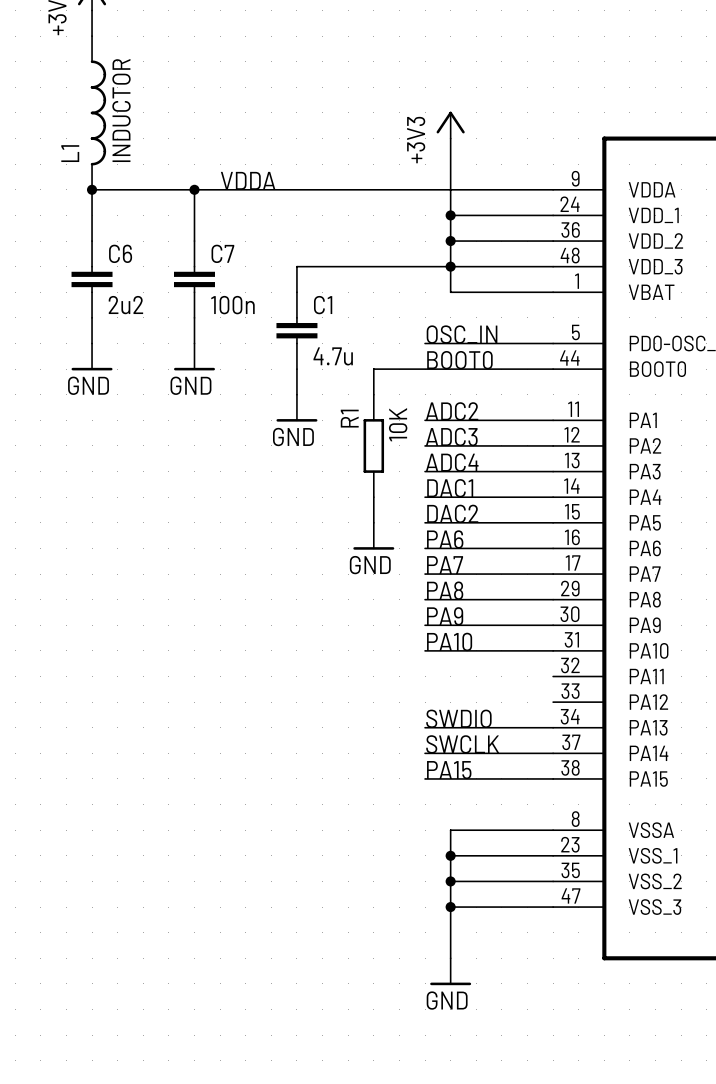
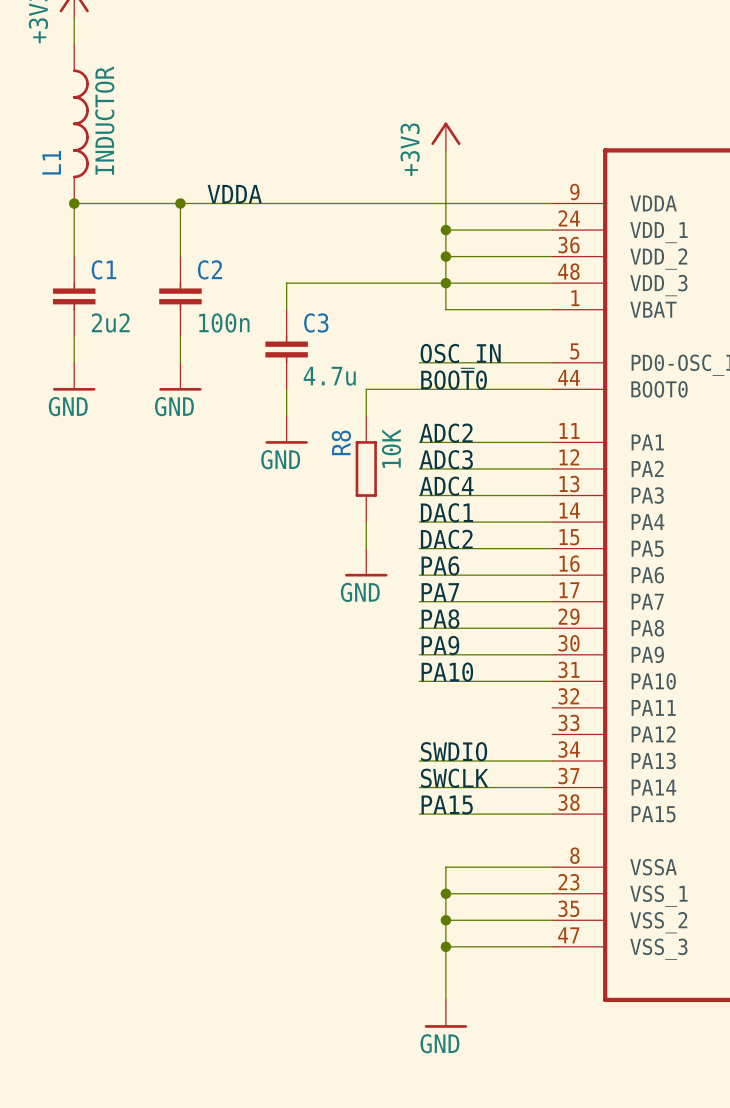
C6 name: C6 (120, 253) -> C1 (103, 269)
C7 name: C7 (222, 253) -> C2 (209, 269)
C1 name: C1 (323, 305) -> C3 (316, 322)
R1 name: R1 (349, 418) -> R8 (341, 442)

